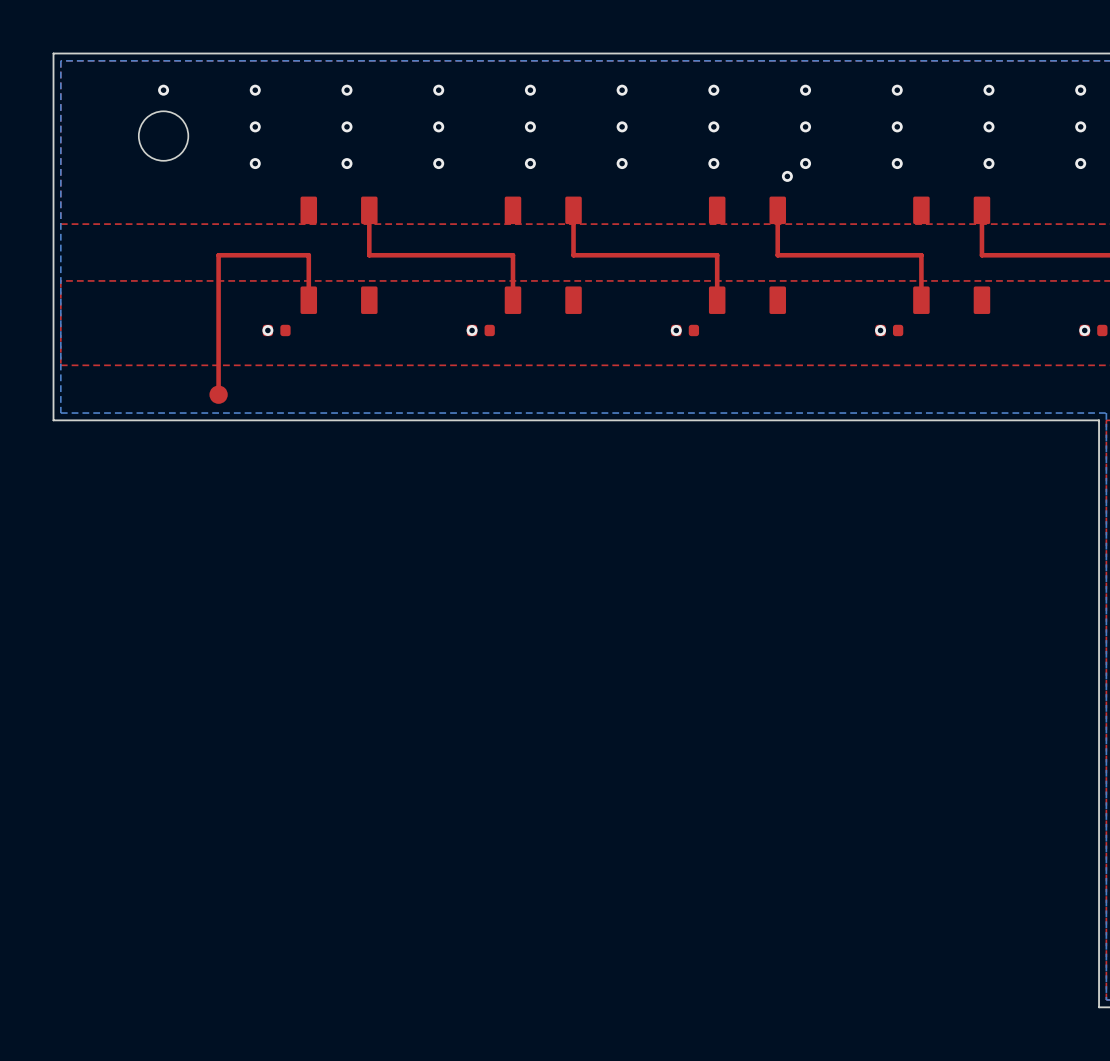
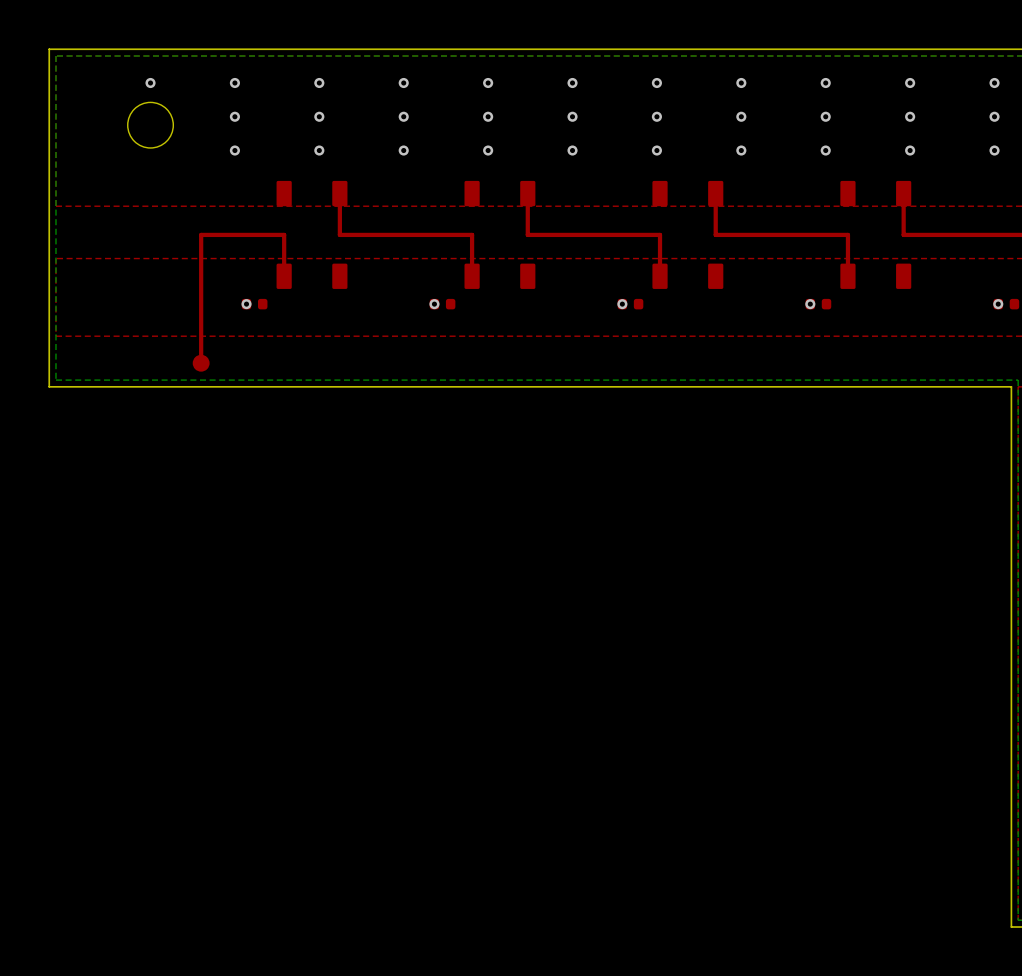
via: (787, 176) -> none

